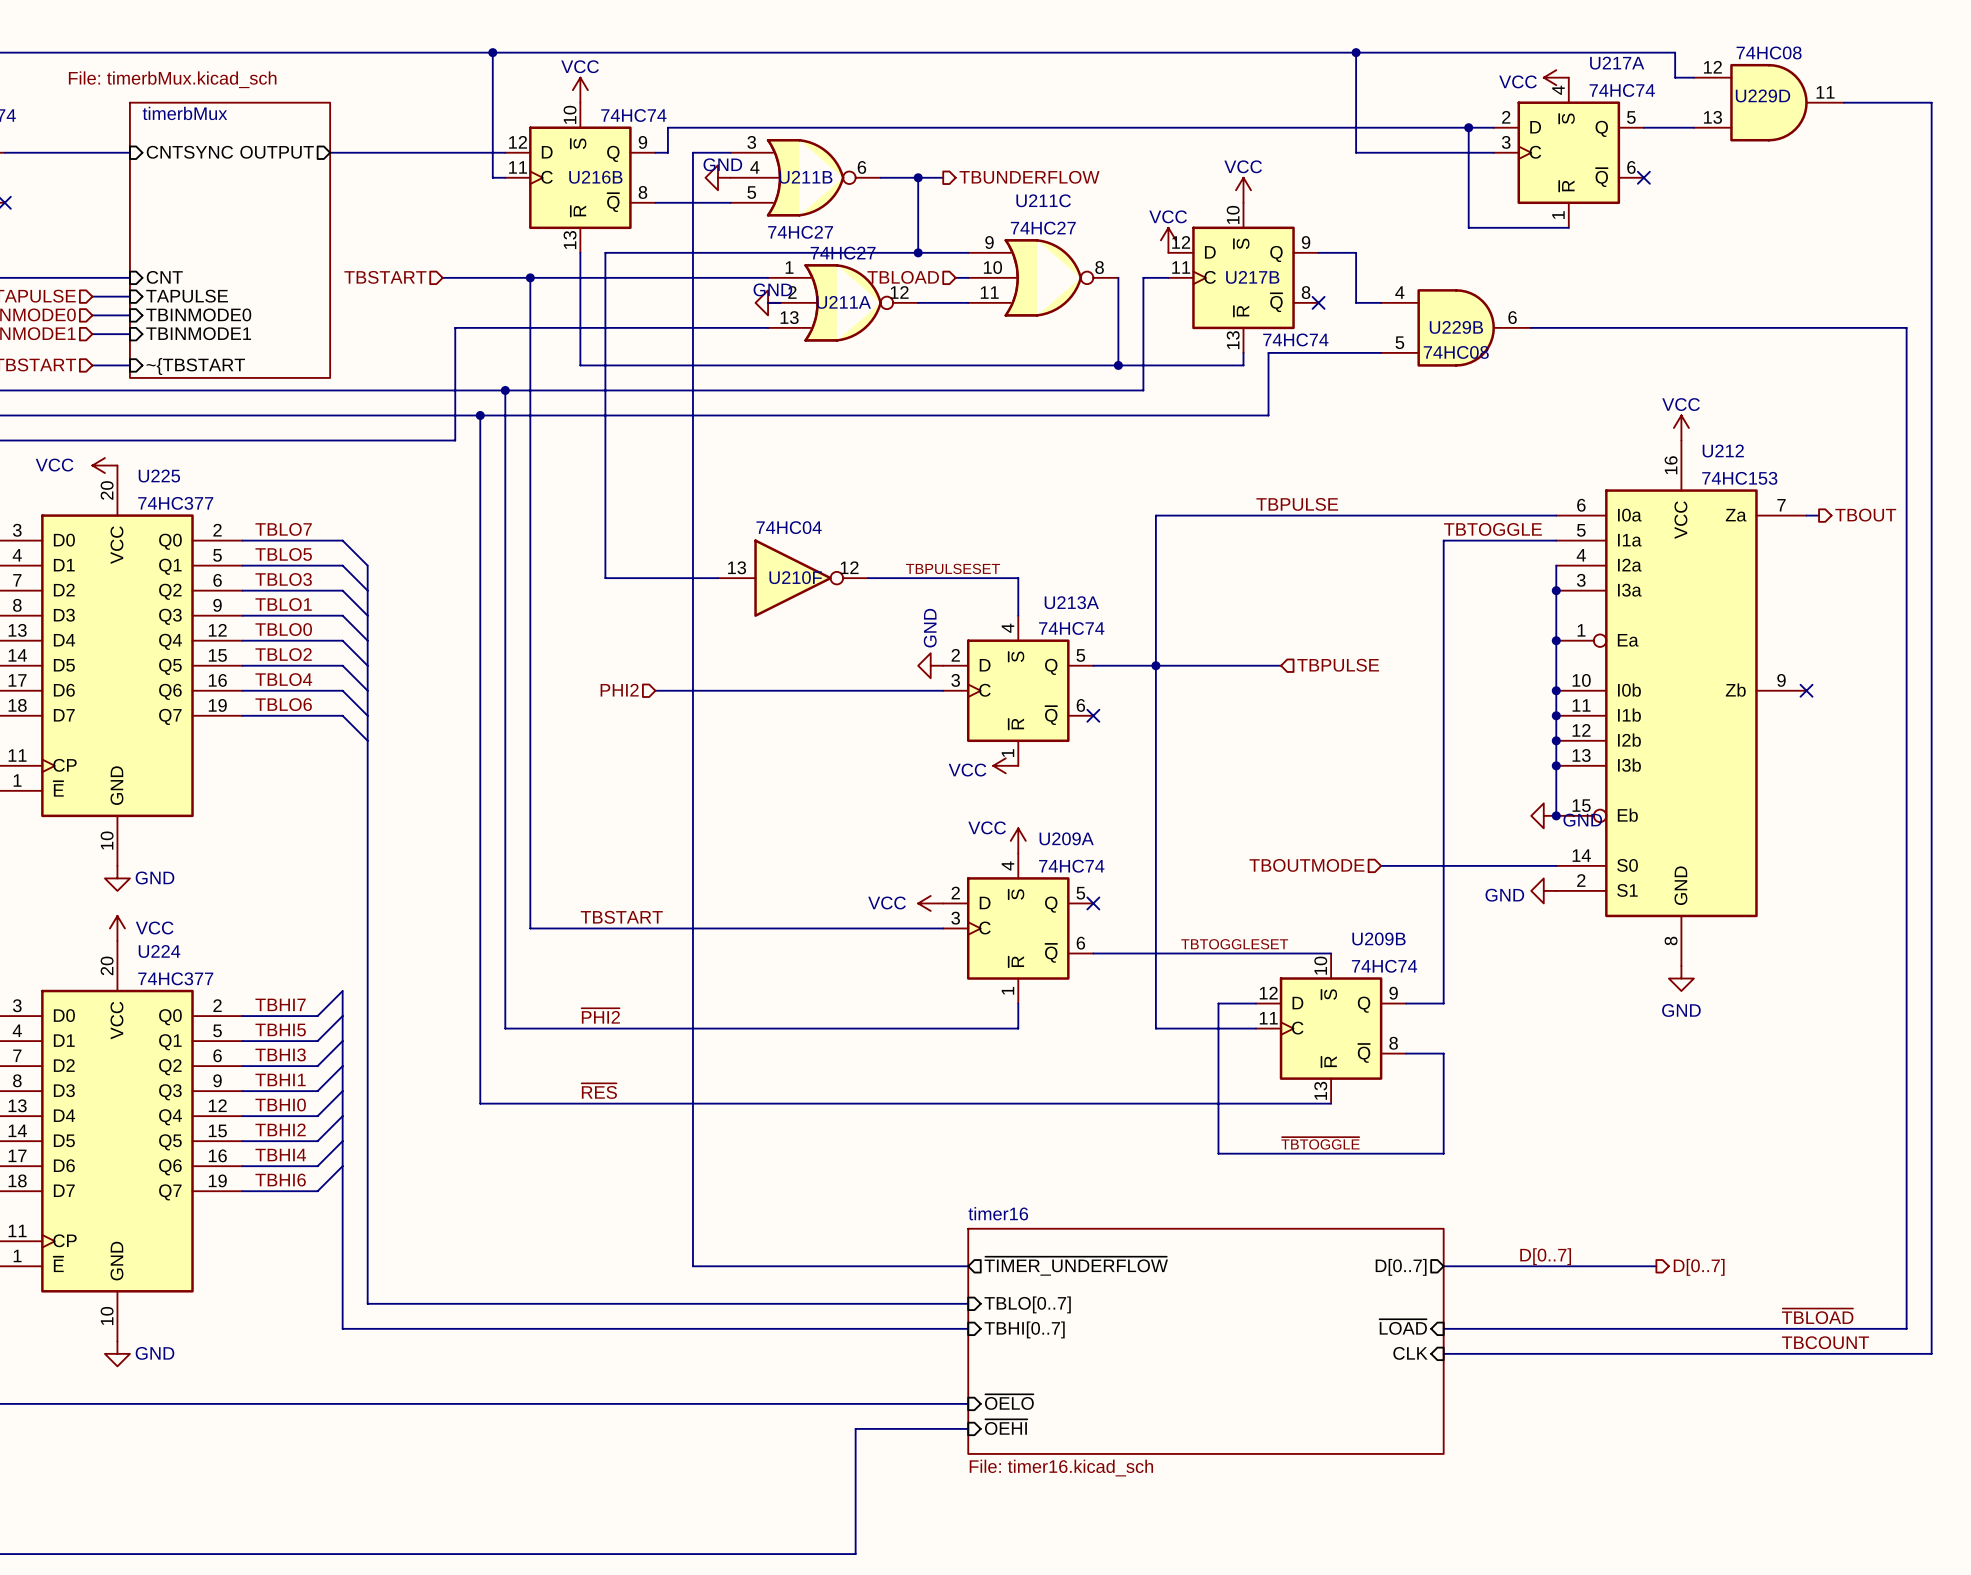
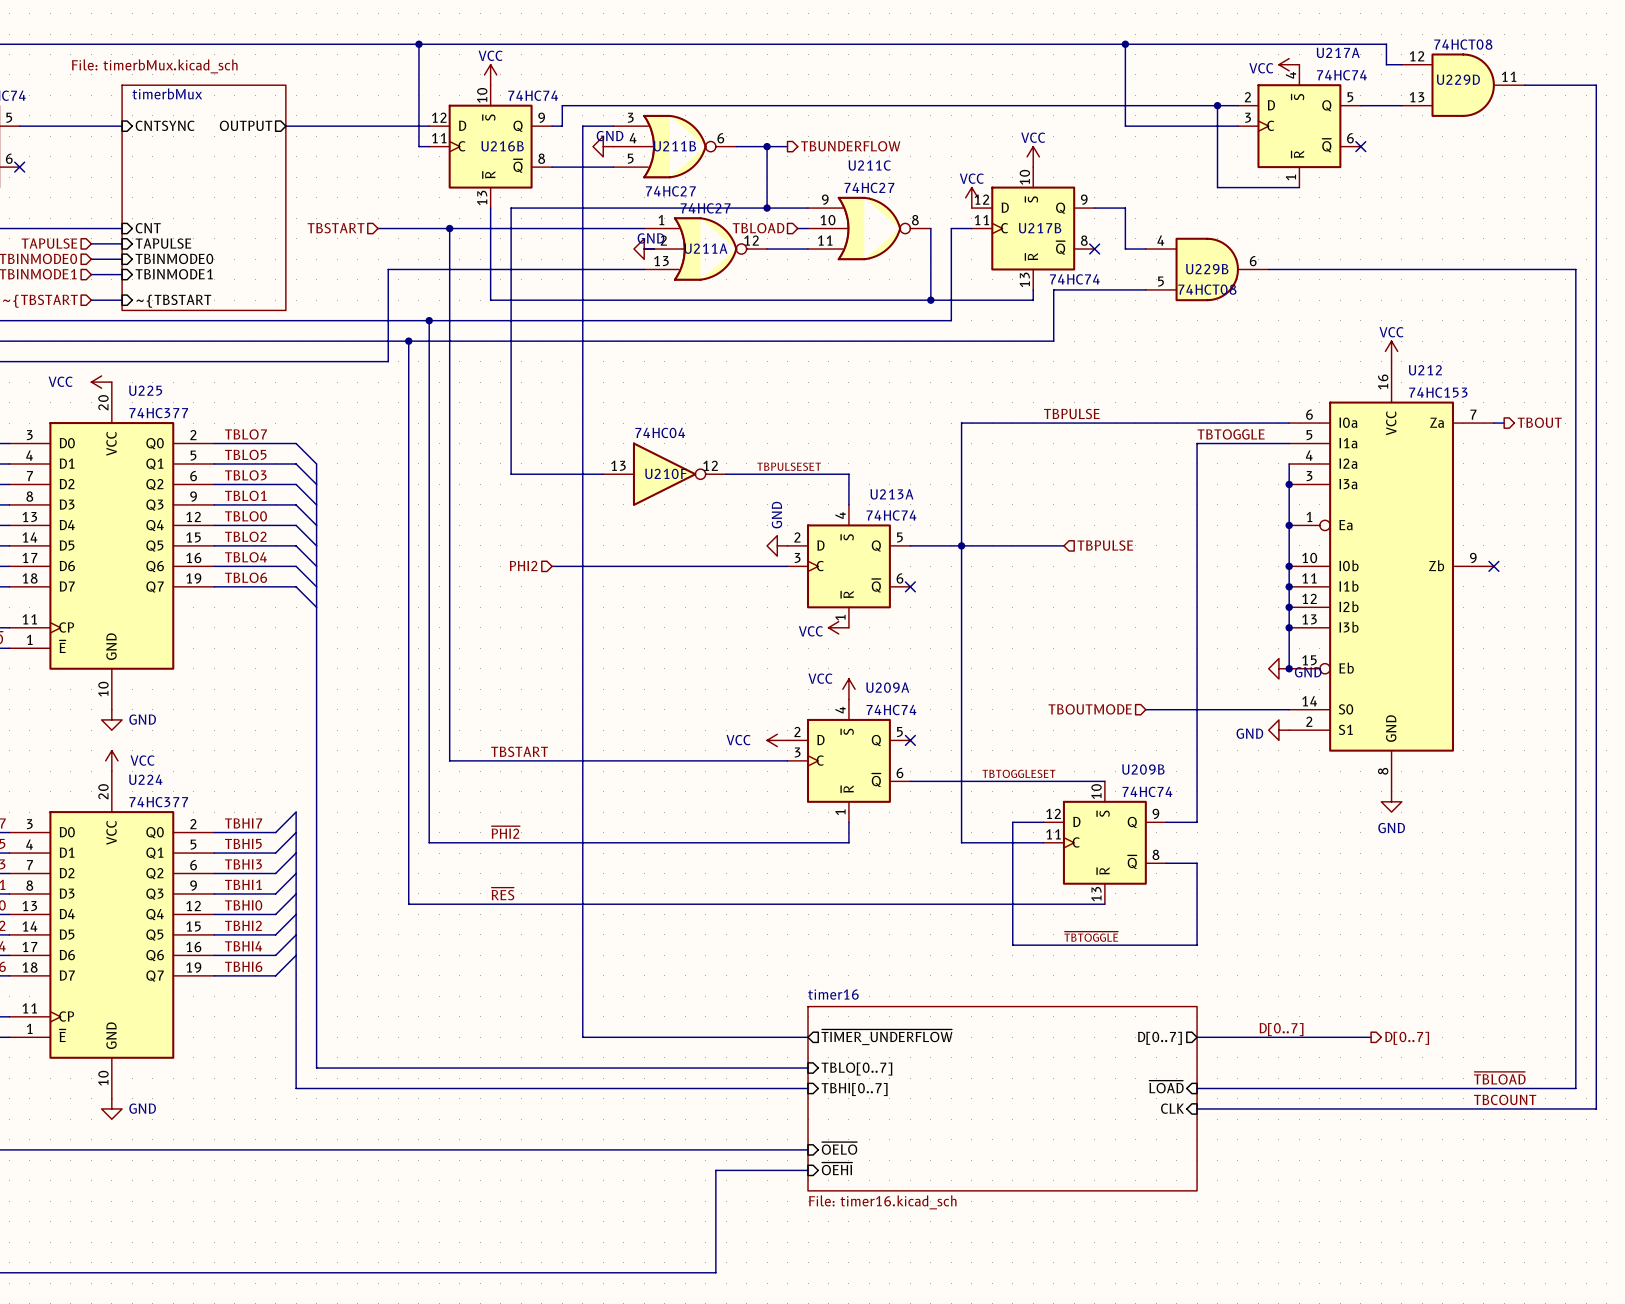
U229D value: 74HC08 (1769, 52) -> 74HCT08 (1463, 44)
U229B value: 74HC08 (1456, 352) -> 74HCT08 (1207, 289)

